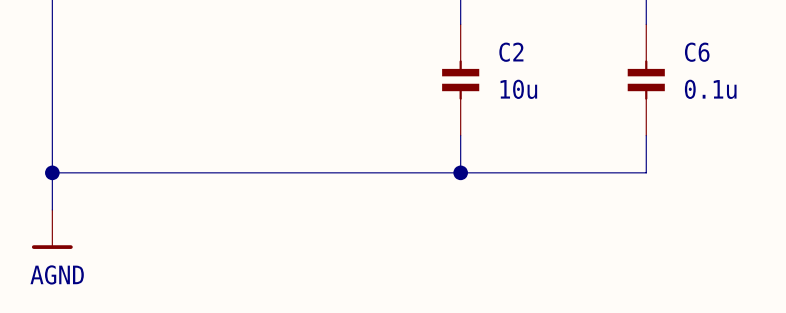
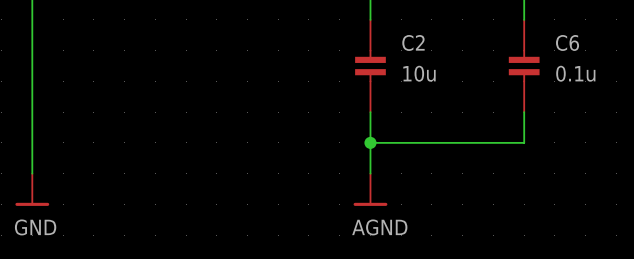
wire: (52, 172) (460, 172) -> (370, 173) (370, 142)
junction: (52, 172) -> none
power symbol: AGND (52, 229) -> GND (32, 189)
power symbol: none -> AGND (370, 189)

